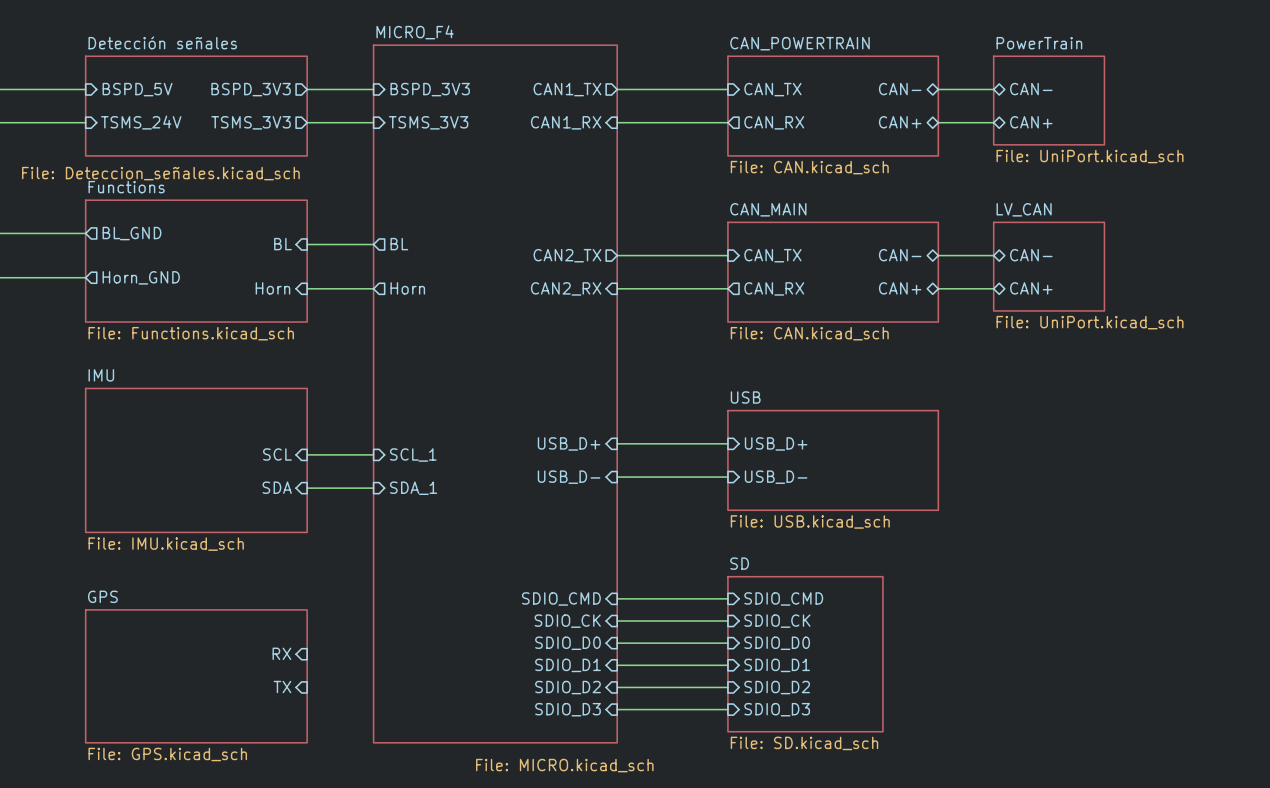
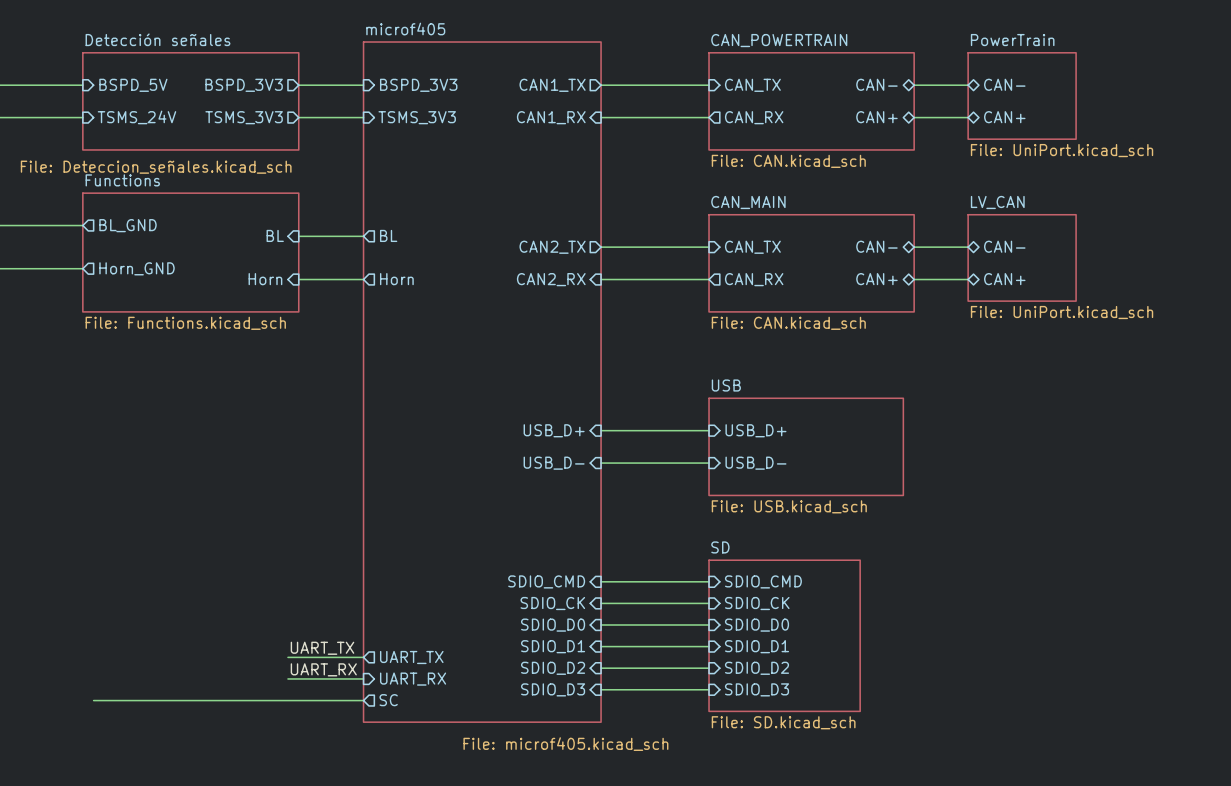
sheet MICRO_F4 name: MICRO_F4 (415, 32) -> microf405 (405, 28)
sheet USB shape: [727, 409, 939, 511] -> [708, 397, 904, 497]
sheet pin: SCL (277, 454) -> none
wire: (307, 454) (373, 454) -> none
sheet pin: SCL_1 (413, 455) -> none
sheet IMU: File: IMU.kicad_sch (196, 460) -> none
sheet pin: SDA (277, 487) -> none
wire: (307, 488) (373, 488) -> none
sheet pin: SDA_1 (413, 488) -> none
sheet pin: RX (281, 653) -> none
label: none -> UART_TX (322, 648)
sheet GPS: File: GPS.kicad_sch (196, 676) -> none
wire: none -> (287, 657) (363, 657)
sheet pin: none -> UART_TX (411, 657)
sheet pin: TX (282, 687) -> none
label: none -> UART_RX (323, 669)
wire: none -> (287, 678) (363, 678)
sheet pin: none -> UART_RX (413, 679)
wire: none -> (93, 700) (363, 700)
sheet pin: none -> SC (388, 700)
sheet MICRO_F4 value: File: MICRO.kicad_sch (564, 765) -> File: microf405.kicad_sch (565, 744)

